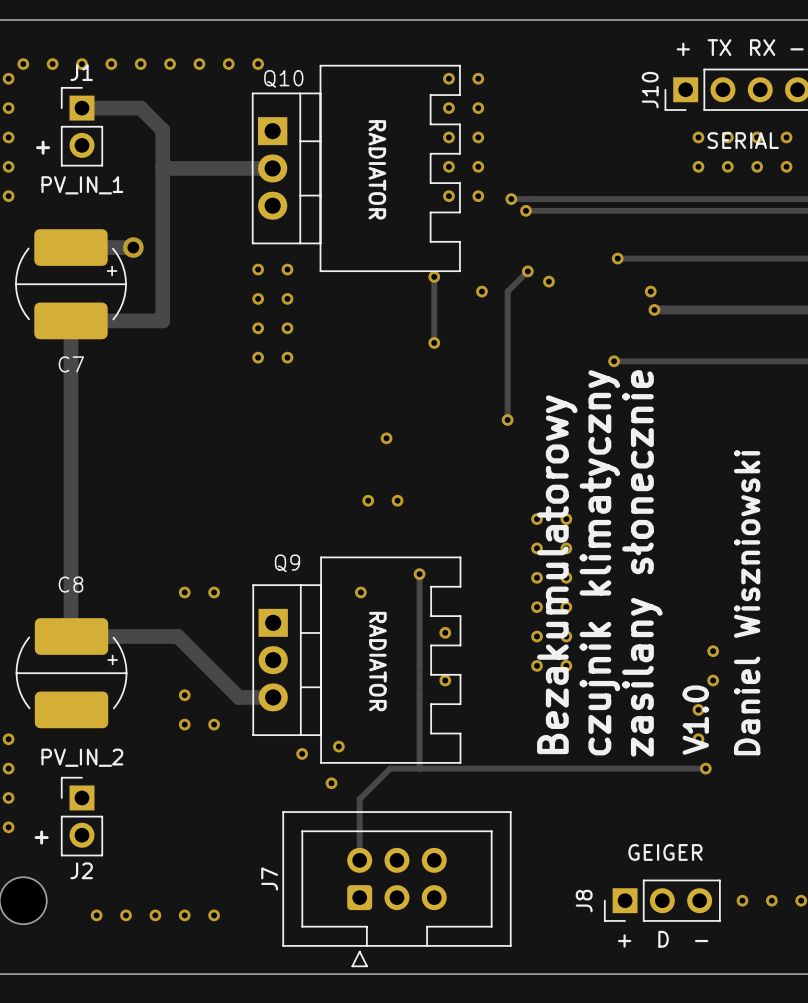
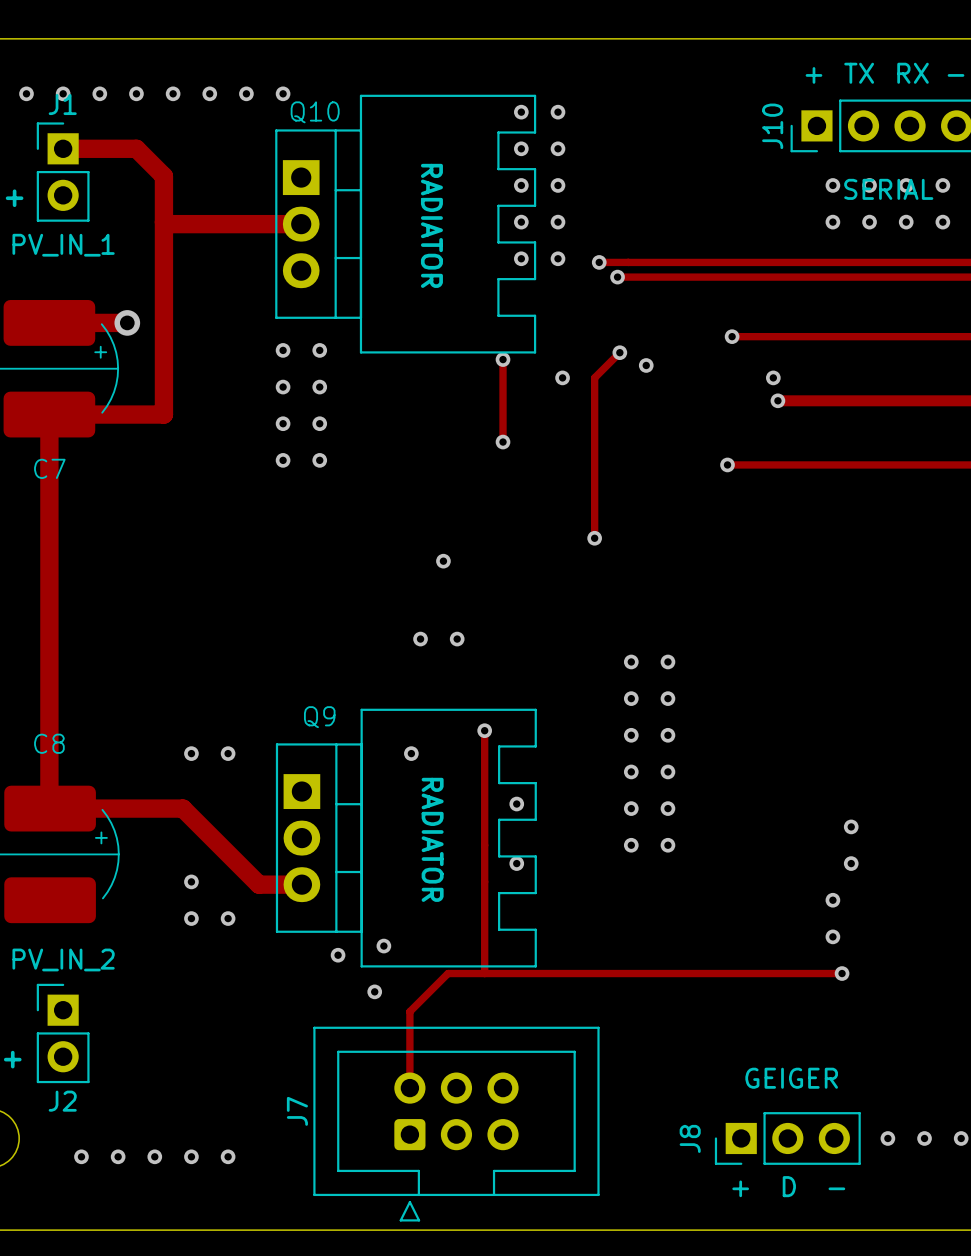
text: czujnik klimatyczny (599, 562) -> none
text: zasilany słonecznie (642, 563) -> none
text: Bezakumulatorowy (557, 574) -> none
text: Daniel Wiszniowski (747, 602) -> none
text: V1.0 (695, 720) -> none

